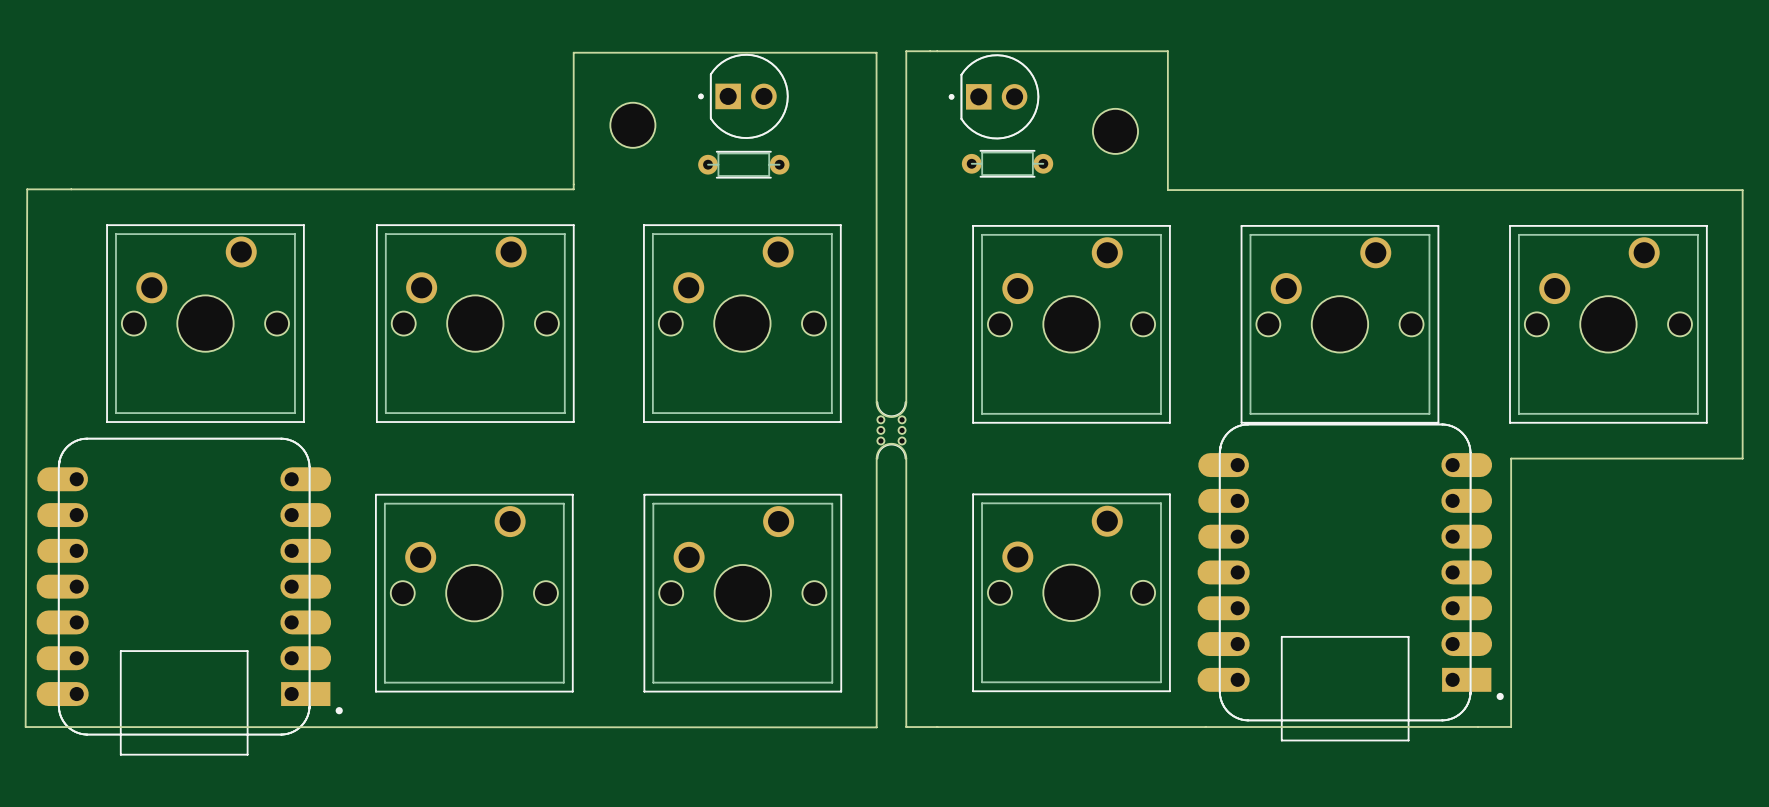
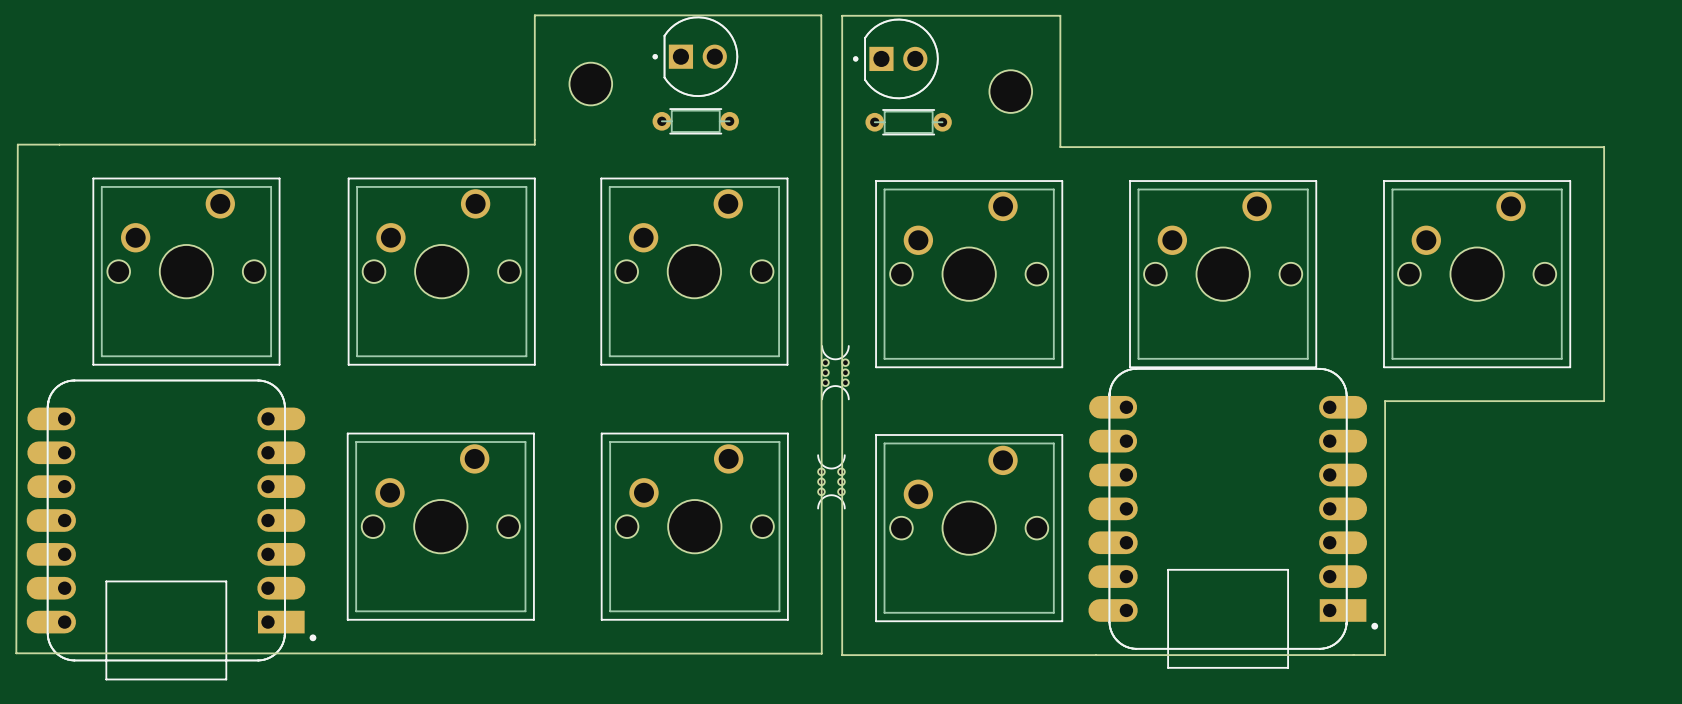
board edge: (876, 52) (876, 402) (879, 411) (889, 416) (900, 413) (906, 402) (906, 51) (1167, 51) (1167, 190) (1742, 190) (1742, 458) (1511, 458) (1511, 726) (906, 727) (906, 458) (901, 448) (891, 443) (881, 448) (876, 458) (876, 727) -> (821, 15) (821, 653)
board edge: none -> (842, 15) (842, 655) (1385, 655) (1385, 401) (1604, 401) (1604, 147) (1060, 147) (1060, 15) (842, 15)
part position: (994, 96) -> (895, 58)
part position: (1115, 131) -> (1010, 91)
part position: (1007, 163) -> (908, 122)
part position: (1071, 324) -> (969, 274)
part position: (1339, 324) -> (1223, 274)
part position: (1608, 324) -> (1477, 274)
part: none -> (831, 481)
part position: (1350, 582) -> (1233, 518)
part position: (1071, 592) -> (969, 528)

